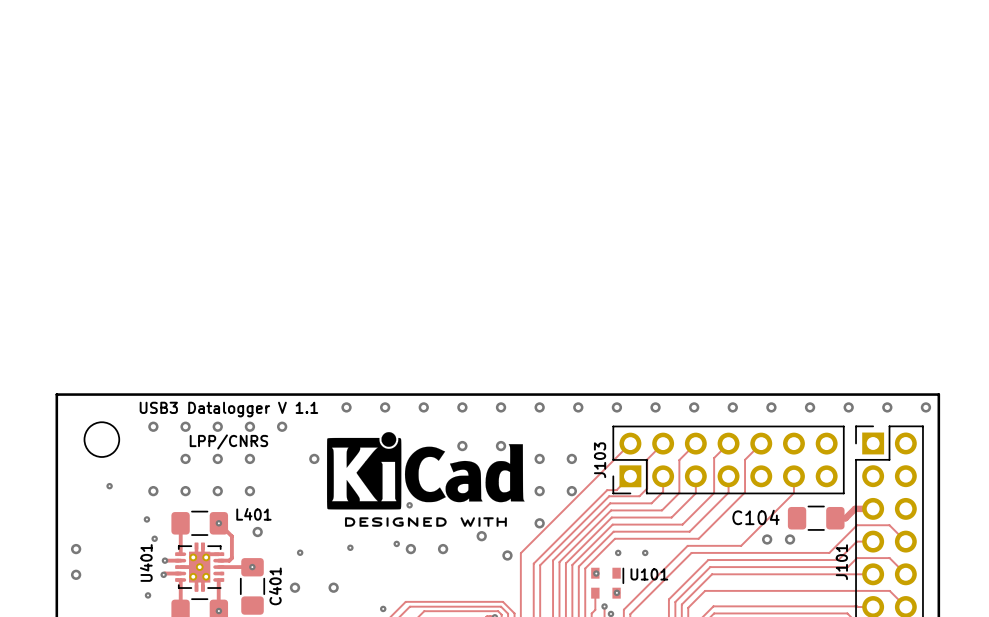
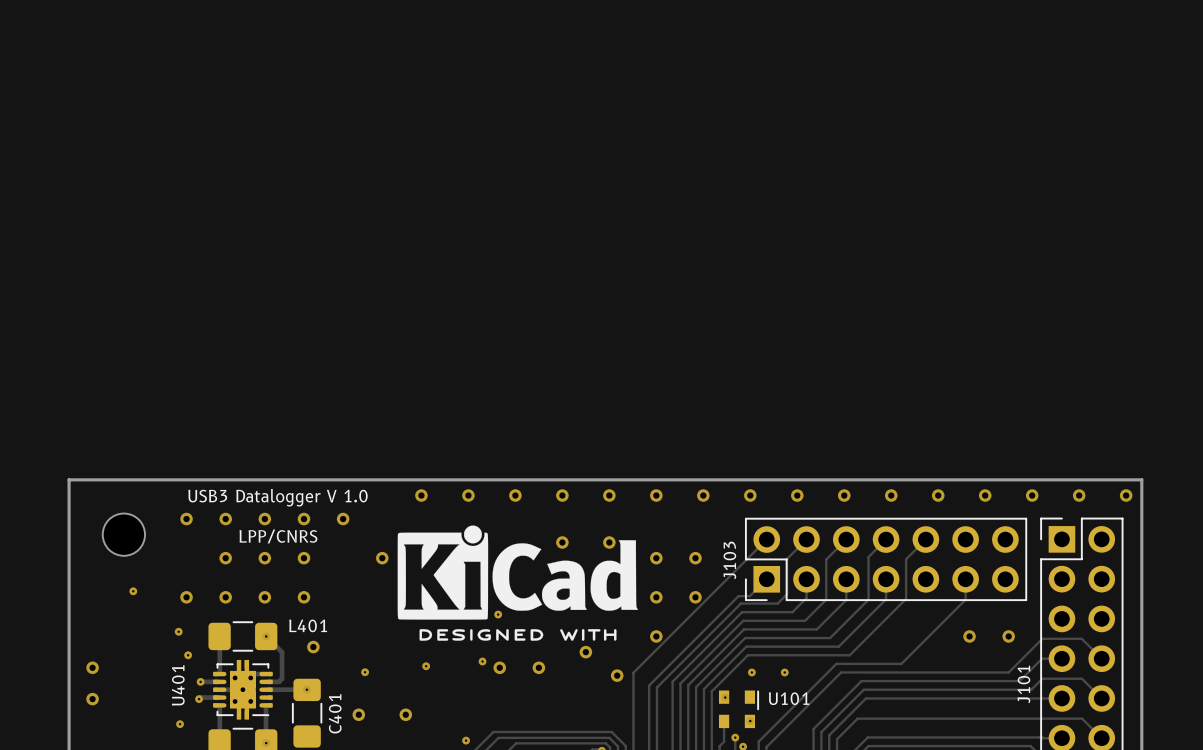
text: USB3 Datalogger V 1.1 (228, 409) -> USB3 Datalogger V 1.0 (277, 497)
track: (873, 508) (854, 508) (845, 518) (835, 518) -> none
C104: (816, 518) -> none
via: none -> (969, 636)
via: none -> (1008, 636)
via: (767, 539) -> none
via: (790, 539) -> none

